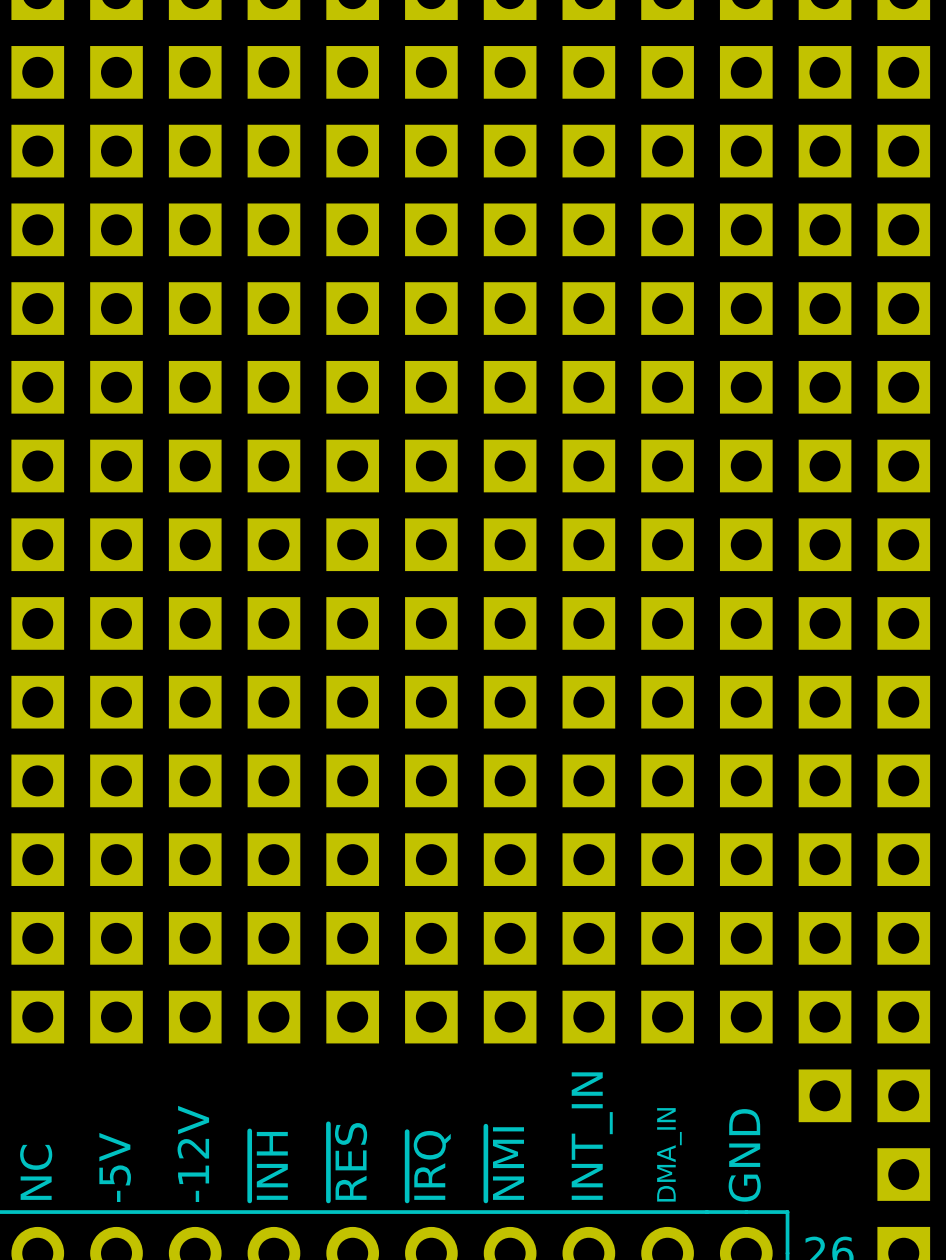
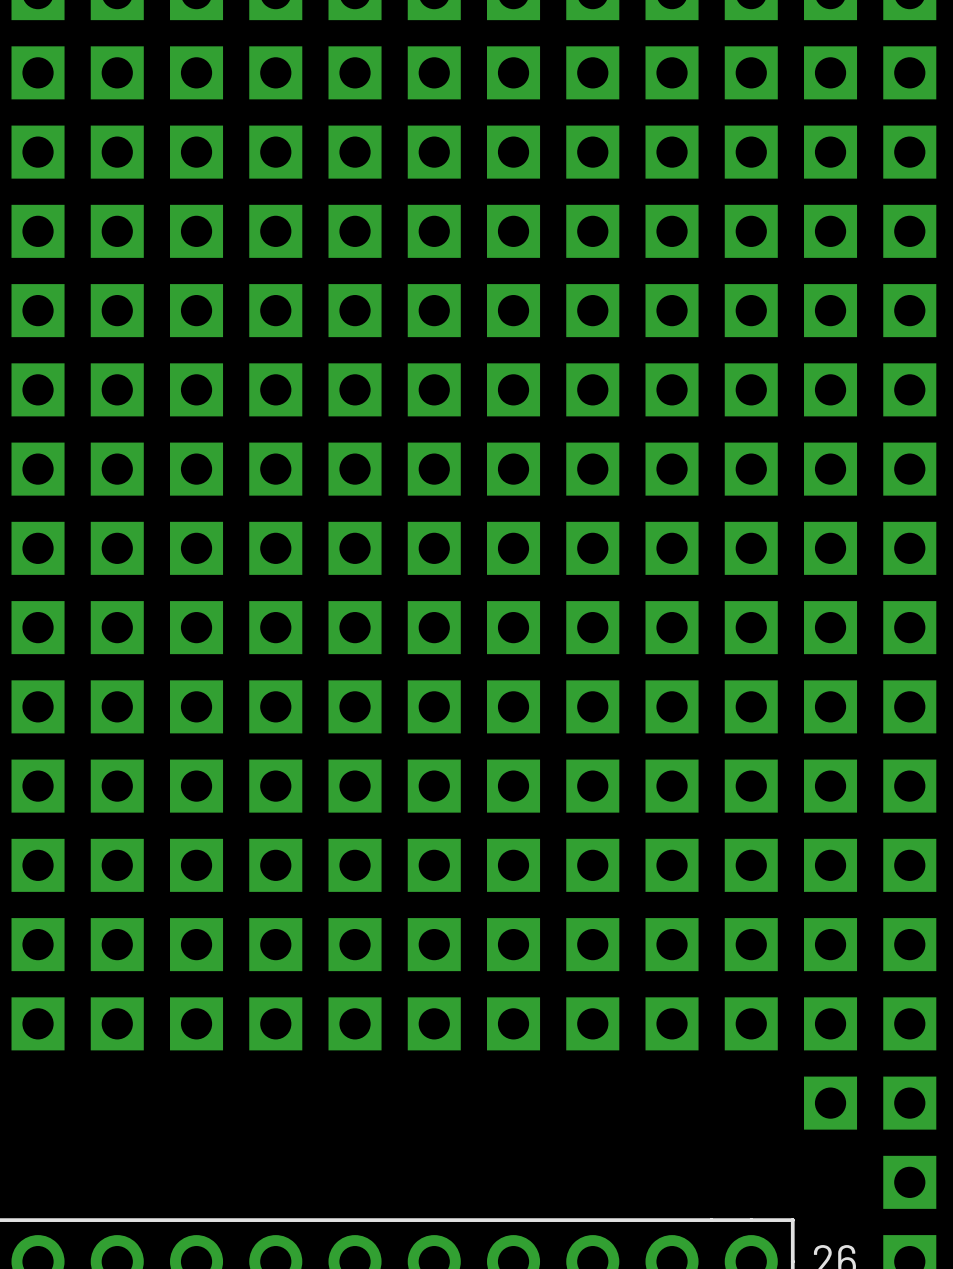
text: INT_IN (592, 1136) -> none
text: -12V (193, 1153) -> none
text: DMA_IN (669, 1154) -> none
text: GND (744, 1155) -> none
text: ~{RES} (347, 1162) -> none
text: ~{NMI} (504, 1163) -> none
text: ~{INH} (268, 1165) -> none
text: ~{IRQ} (428, 1165) -> none
text: -5V (115, 1167) -> none
text: NC (36, 1172) -> none

